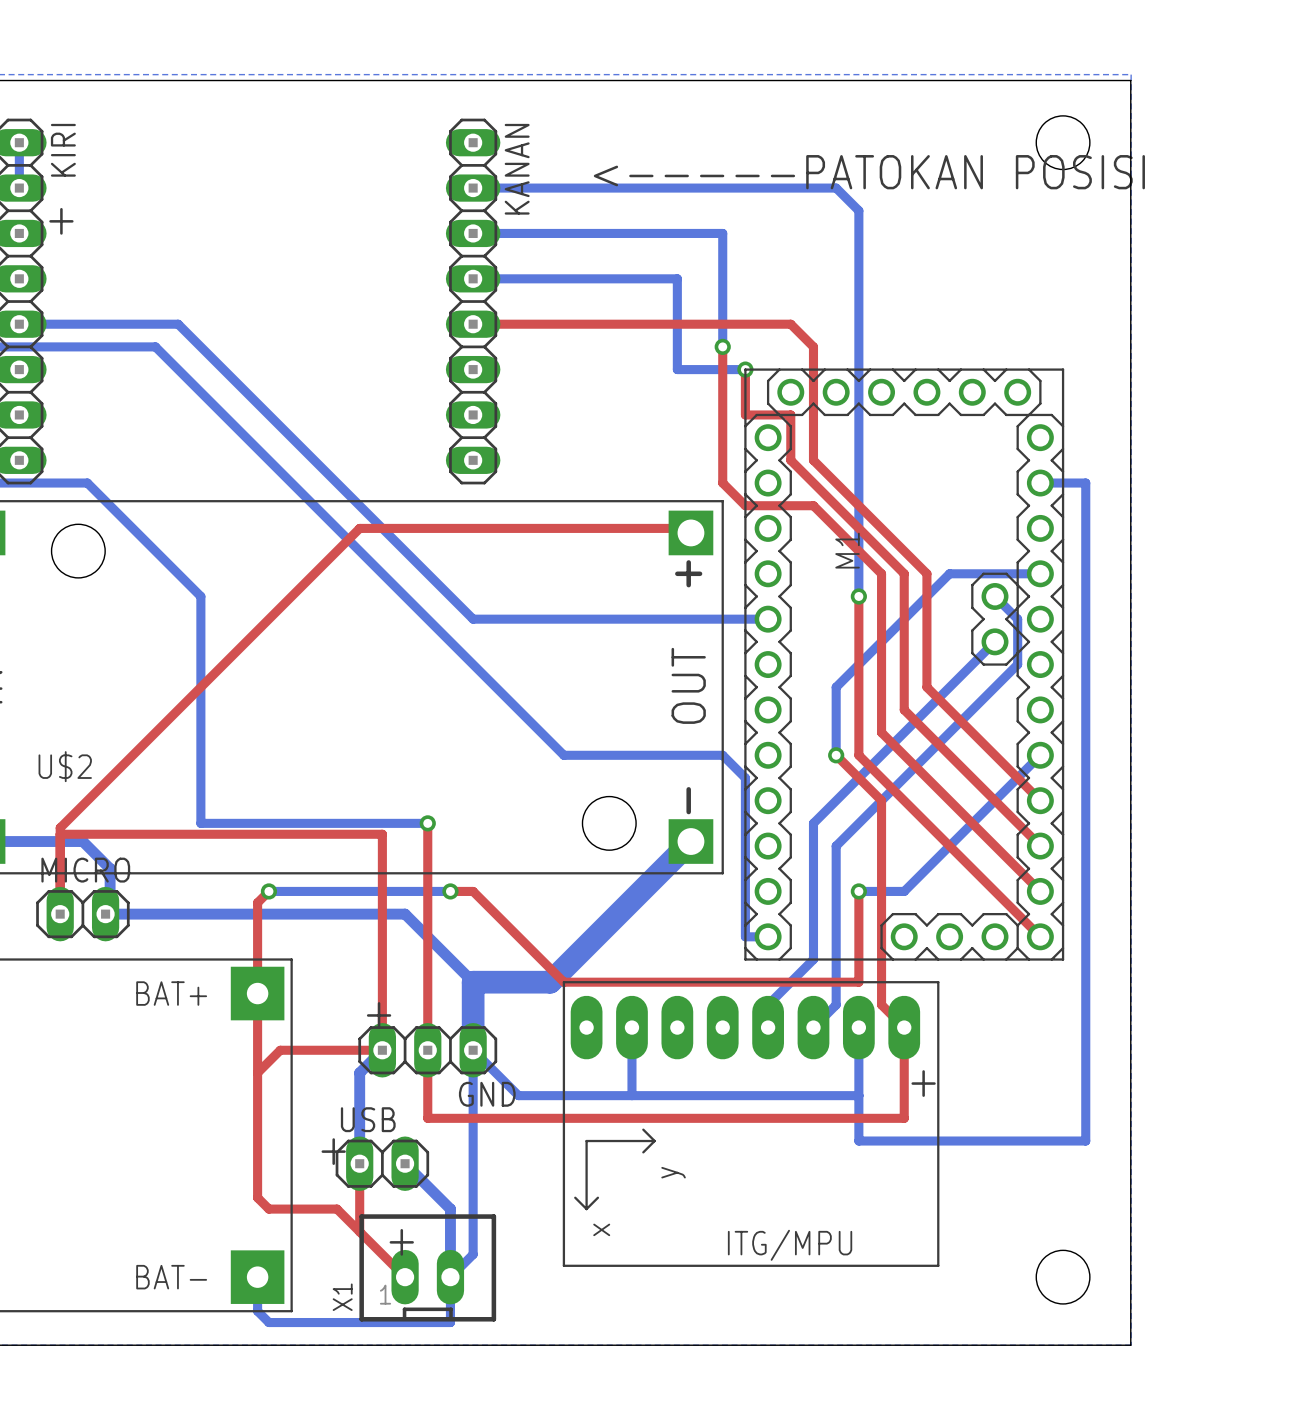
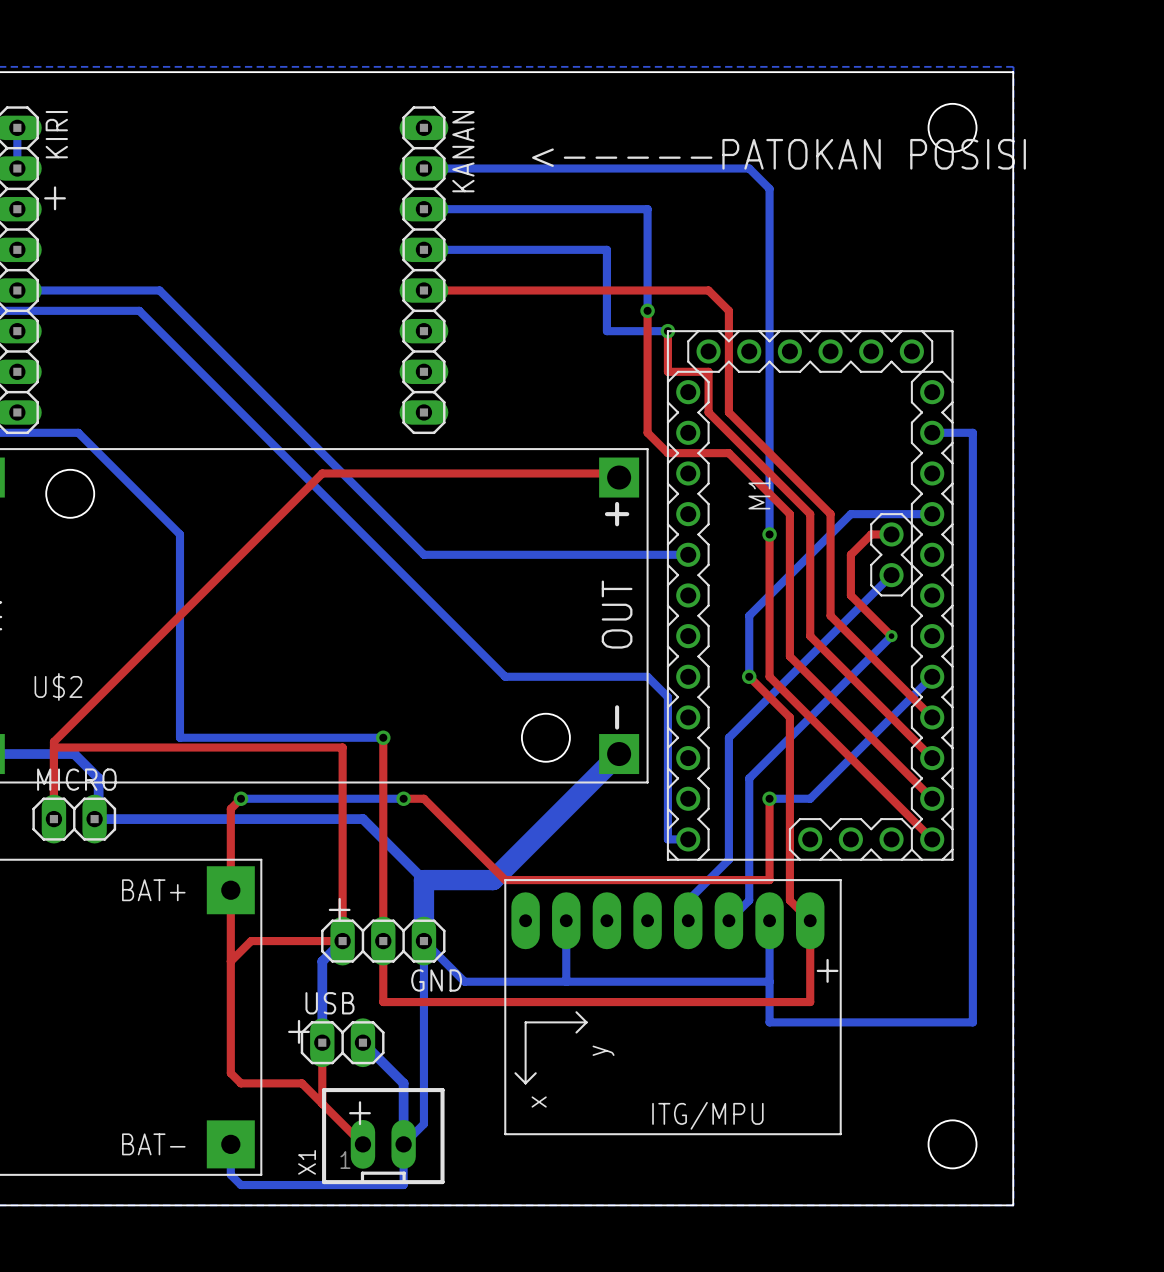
bottom track: (995, 596) (1017, 619) (1017, 664) (836, 846) (836, 868) -> (891, 636) (749, 778)
top track: none -> (891, 534) (871, 534) (850, 554) (850, 595) (891, 636)
via: none -> (891, 636)

